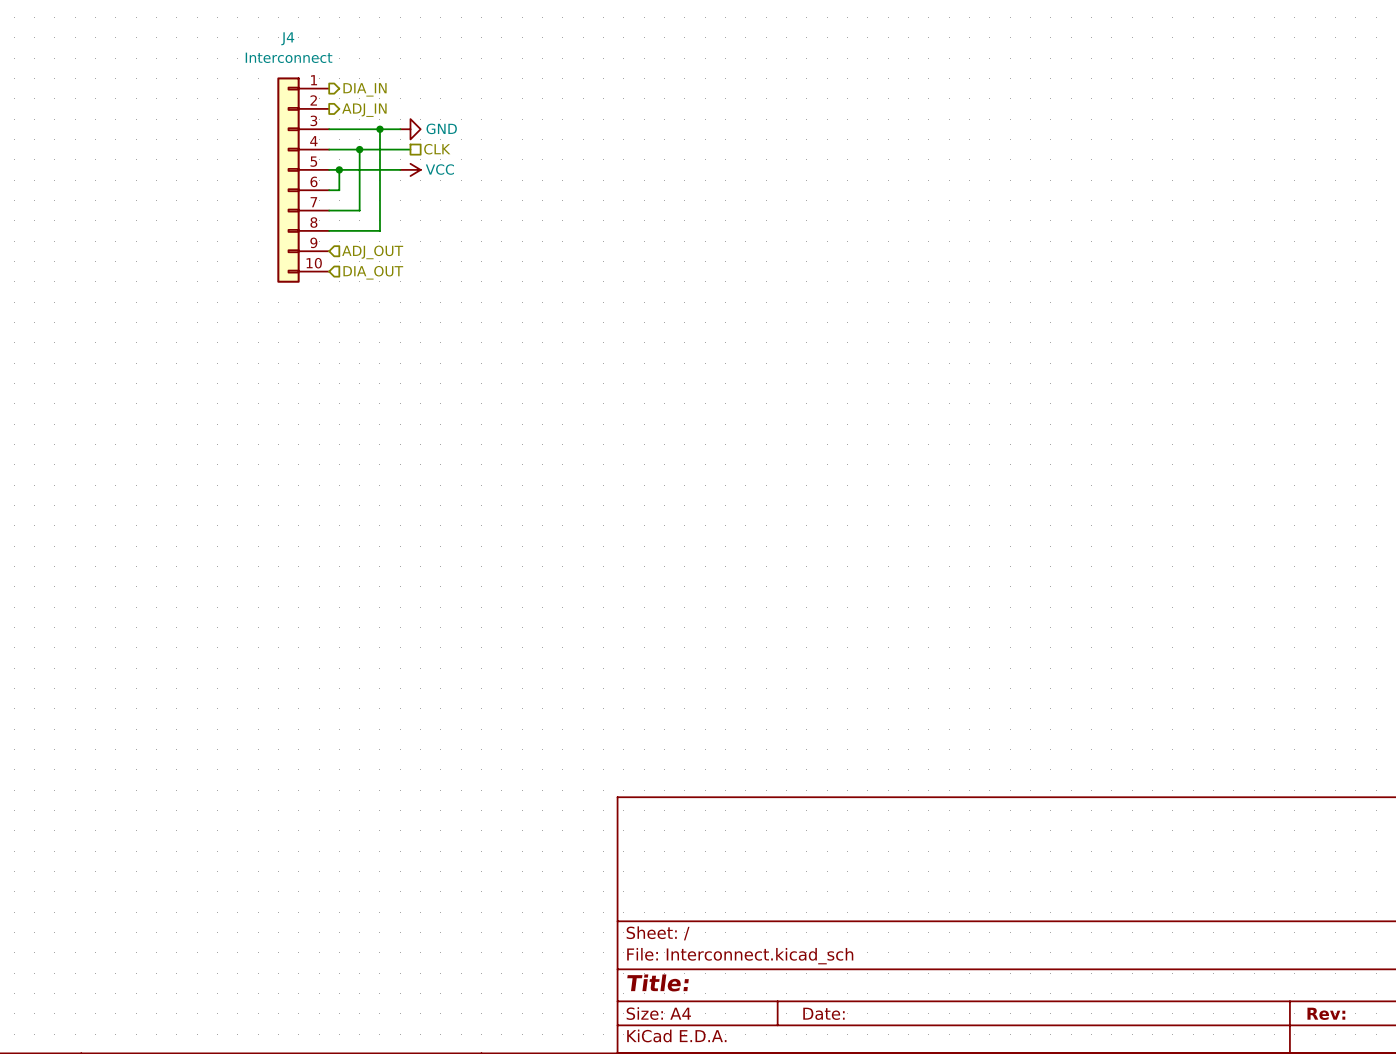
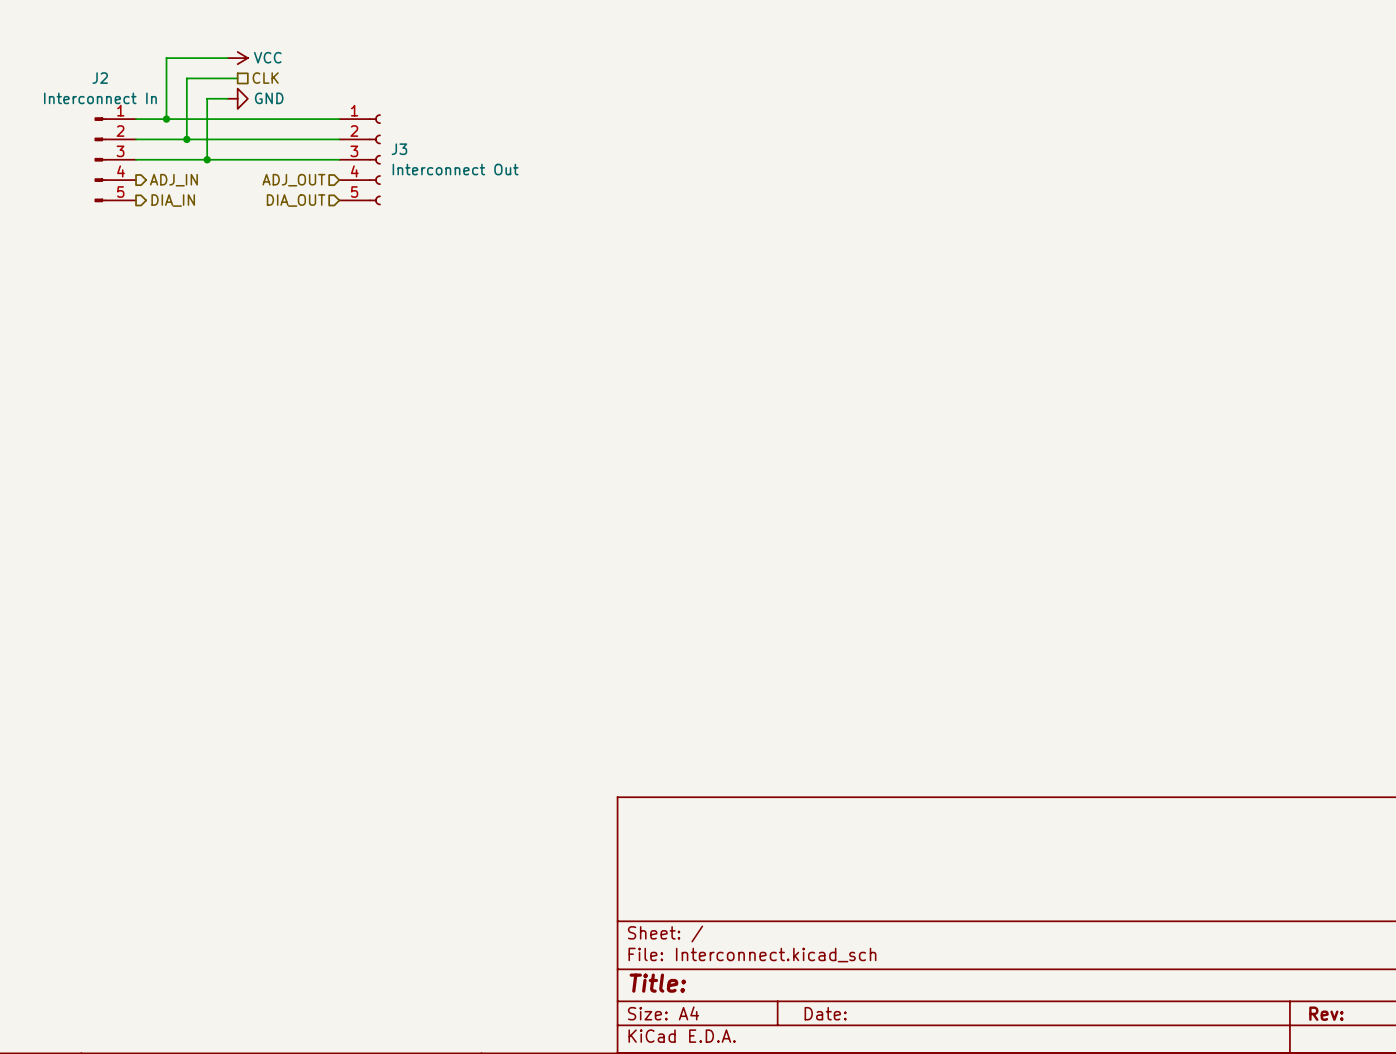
wire: none -> (227, 58) (166, 58) (166, 119)
power symbol: none -> VCC (237, 58)
wire: none -> (237, 78) (186, 78) (186, 139)
hierarchical label: DIA_IN (365, 89) -> none
wire: none -> (227, 98) (207, 98) (207, 159)
hierarchical label: ADJ_IN (364, 110) -> none
wire: none -> (136, 119) (339, 119)
junction: none -> (166, 119)
wire: (329, 129) (400, 129) -> none
wire: (379, 129) (379, 230) (329, 230) -> none
junction: (379, 129) -> none
power symbol position: GND (410, 129) -> GND (237, 98)
wire: none -> (136, 139) (339, 139)
junction: none -> (186, 139)
wire: (329, 149) (410, 149) -> none
wire: (359, 149) (359, 210) (329, 210) -> none
junction: (359, 149) -> none
hierarchical label position: CLK (437, 149) -> CLK (265, 78)
J2: none -> Interconnect In (115, 159)
wire: none -> (136, 159) (339, 159)
junction: none -> (207, 159)
J3: none -> Interconnect Out (359, 159)
wire: (329, 169) (400, 169) -> none
wire: (339, 169) (339, 190) (329, 190) -> none
junction: (339, 169) -> none
power symbol: VCC (410, 169) -> none
J4: Interconnect (303, 180) -> none
hierarchical label: none -> ADJ_IN (173, 180)
hierarchical label: none -> DIA_IN (173, 200)
hierarchical label rotation: 0° (372, 252) -> 180° (293, 180)
hierarchical label position: ADJ_OUT (372, 252) -> ADJ_OUT (293, 180)
hierarchical label rotation: 0° (373, 272) -> 180° (296, 200)
hierarchical label position: DIA_OUT (373, 272) -> DIA_OUT (296, 200)

